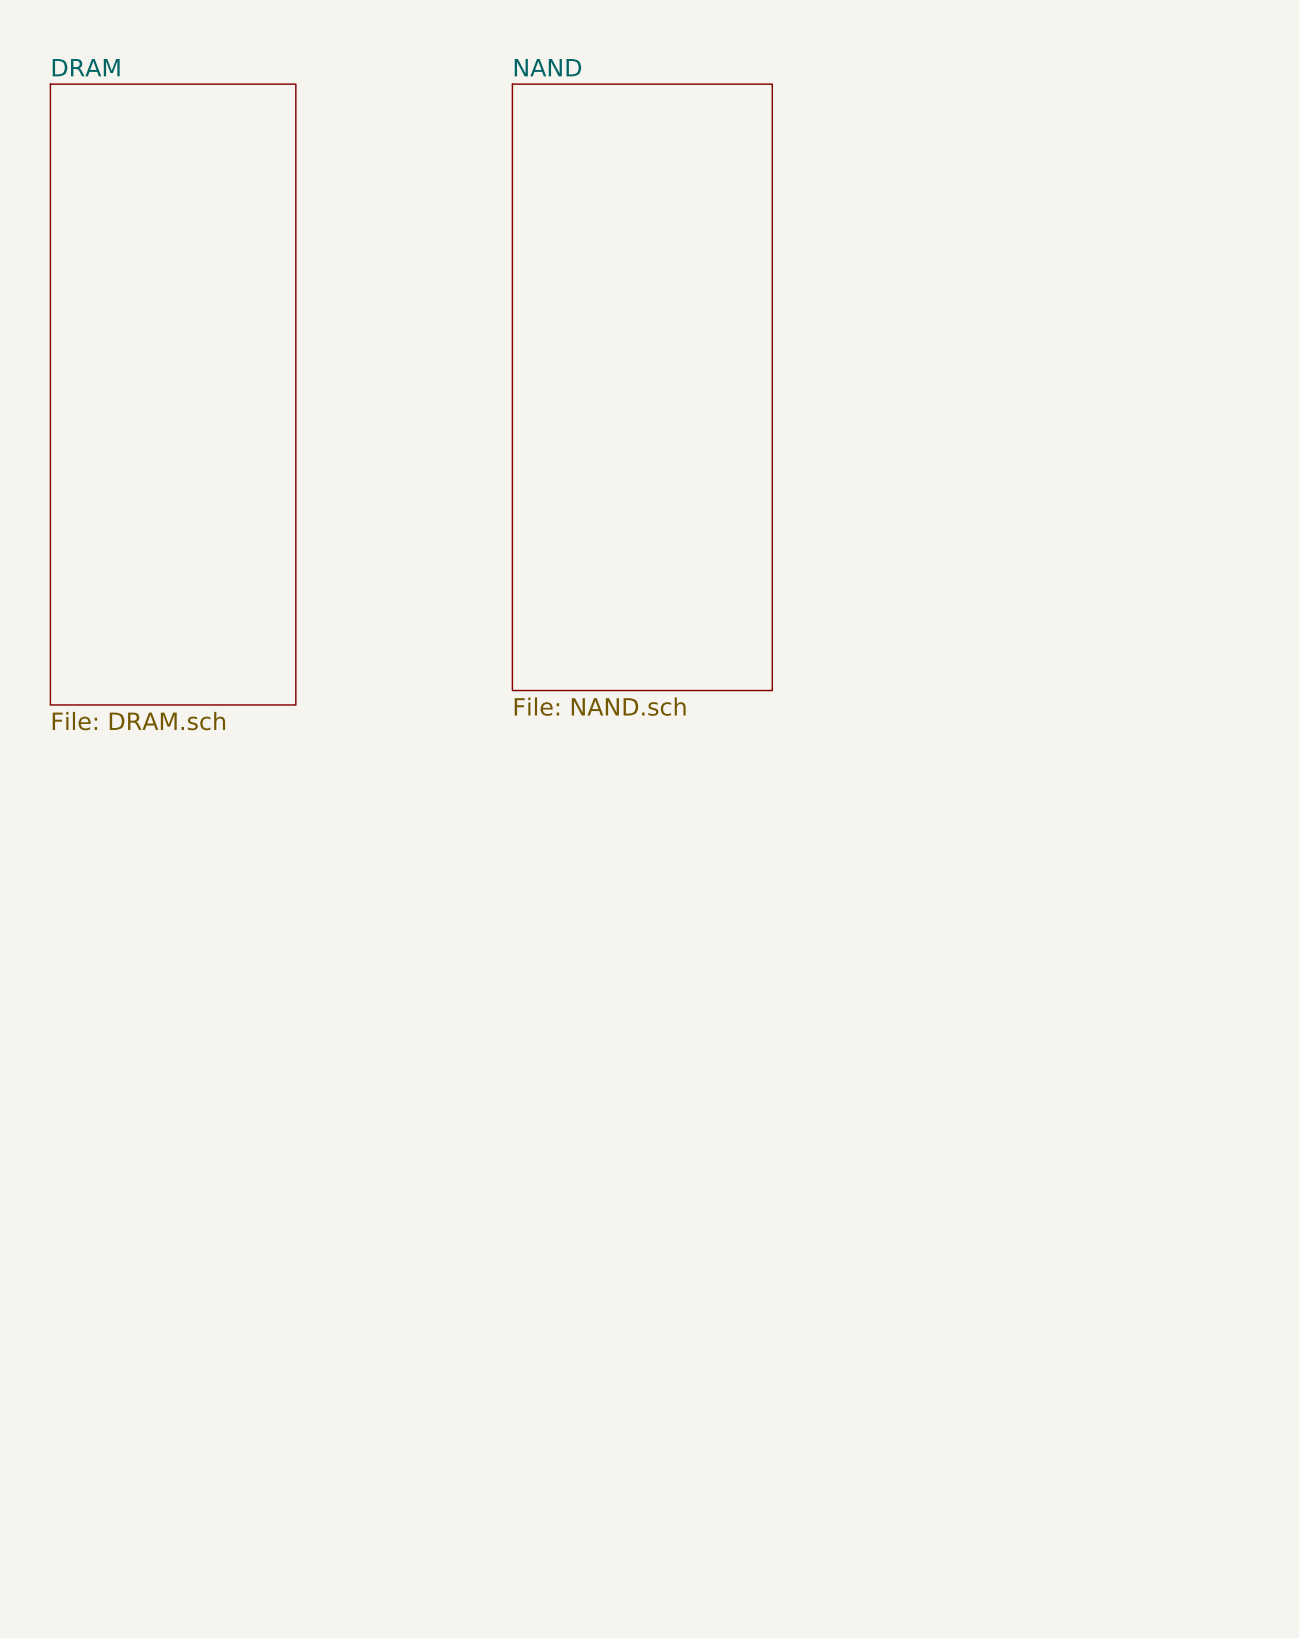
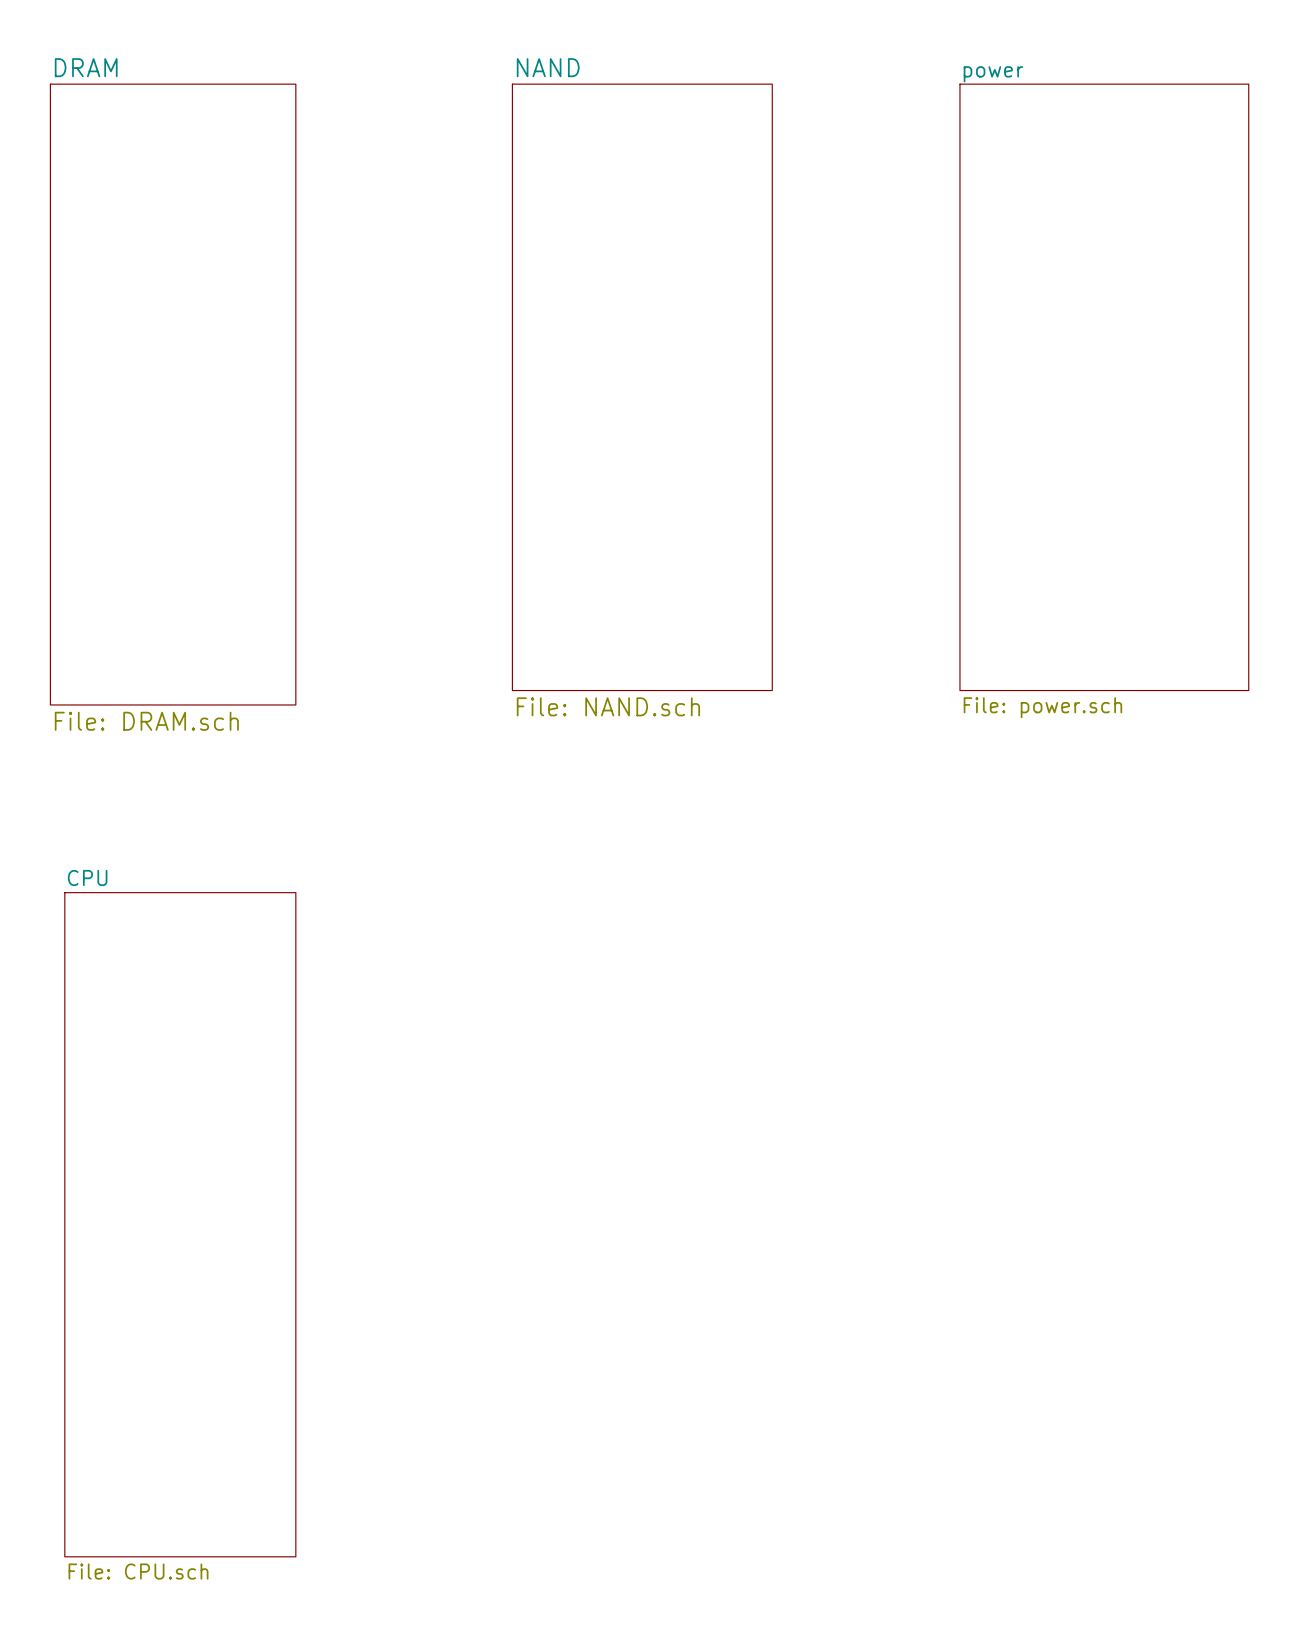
sheet power: none -> File: power.sch (1104, 387)
sheet CPU: none -> File: CPU.sch (180, 1224)

